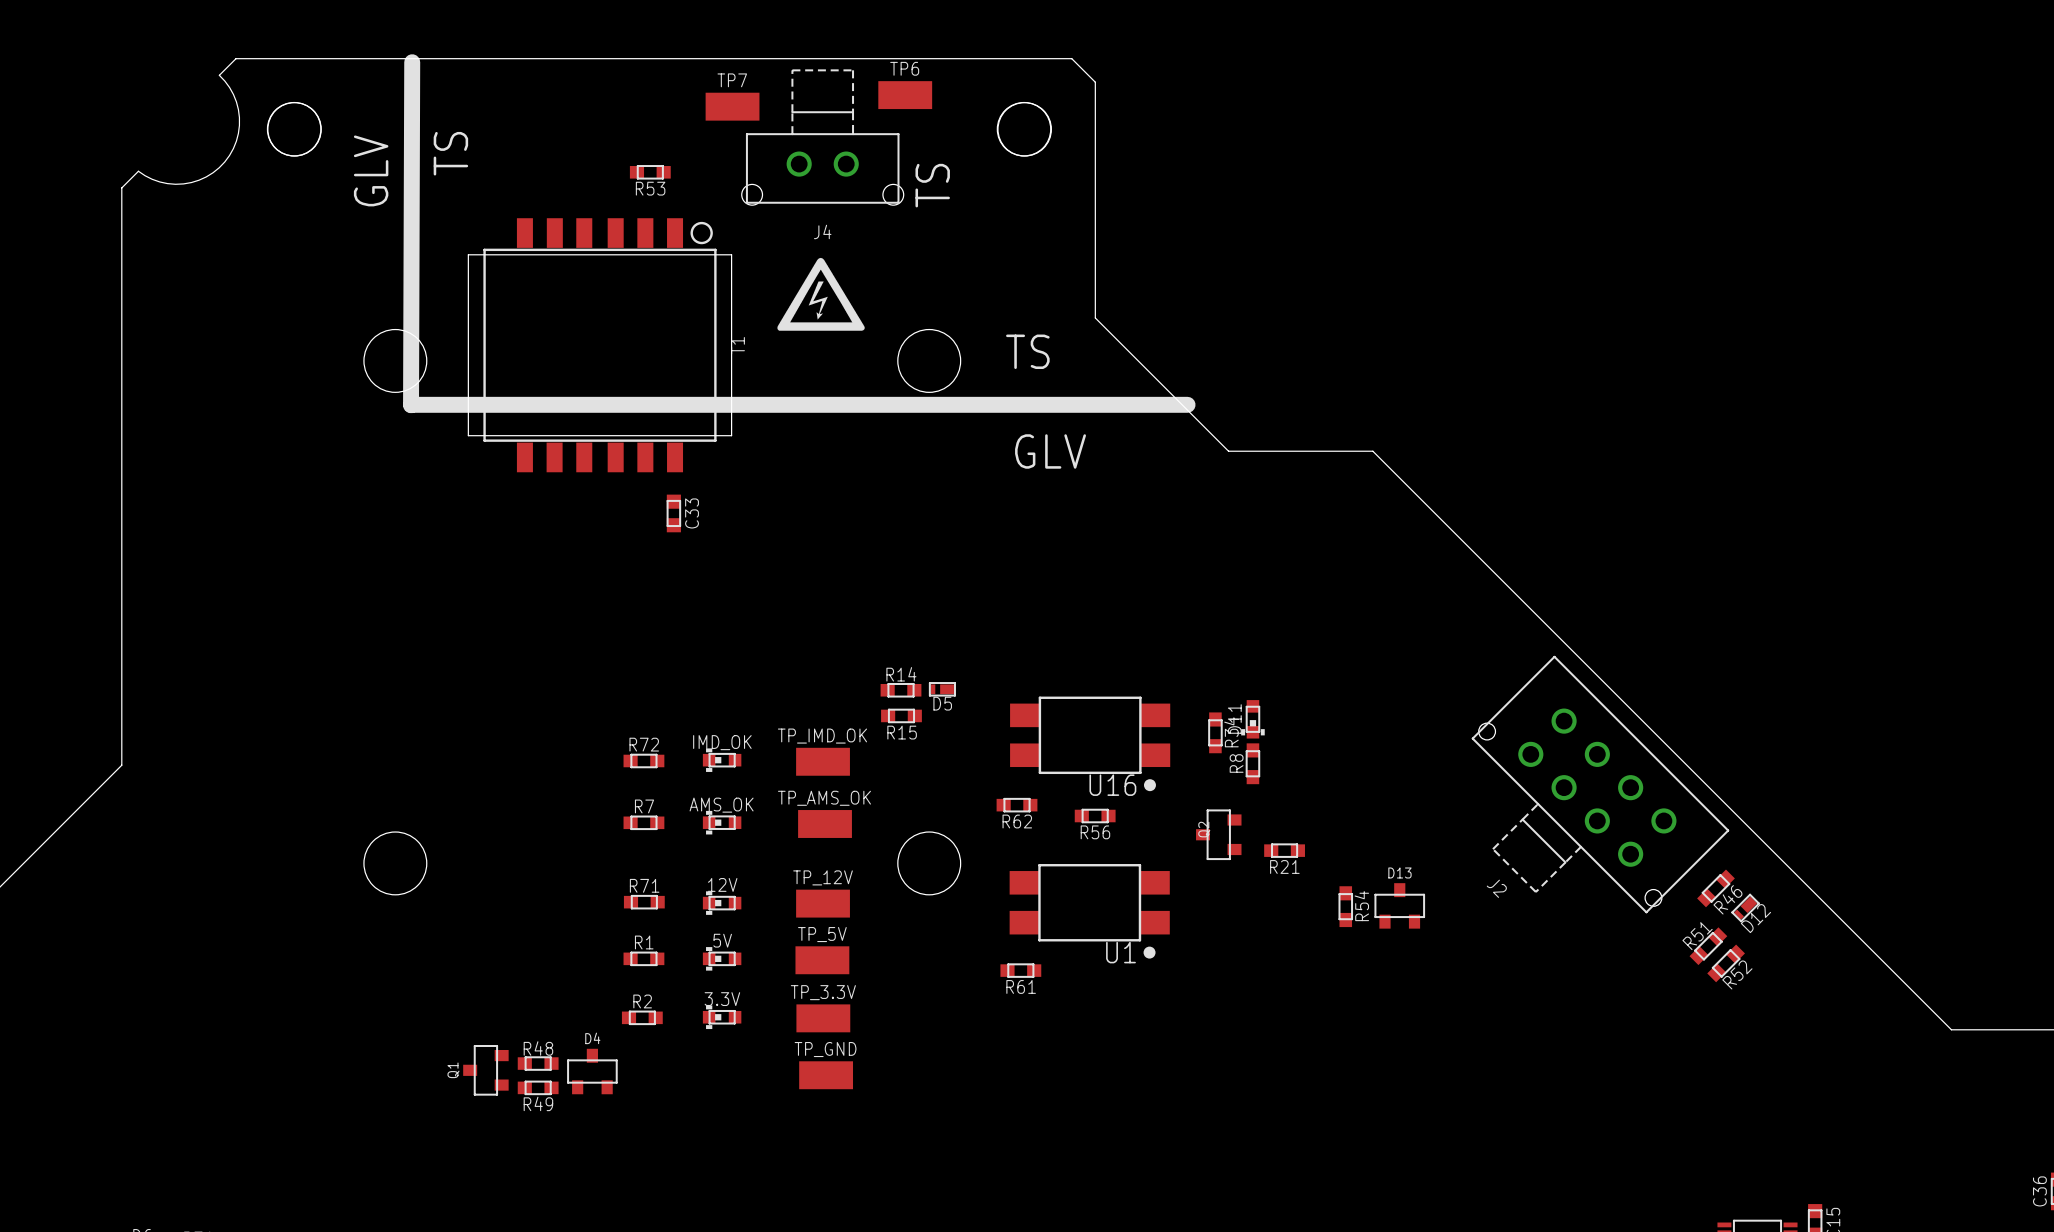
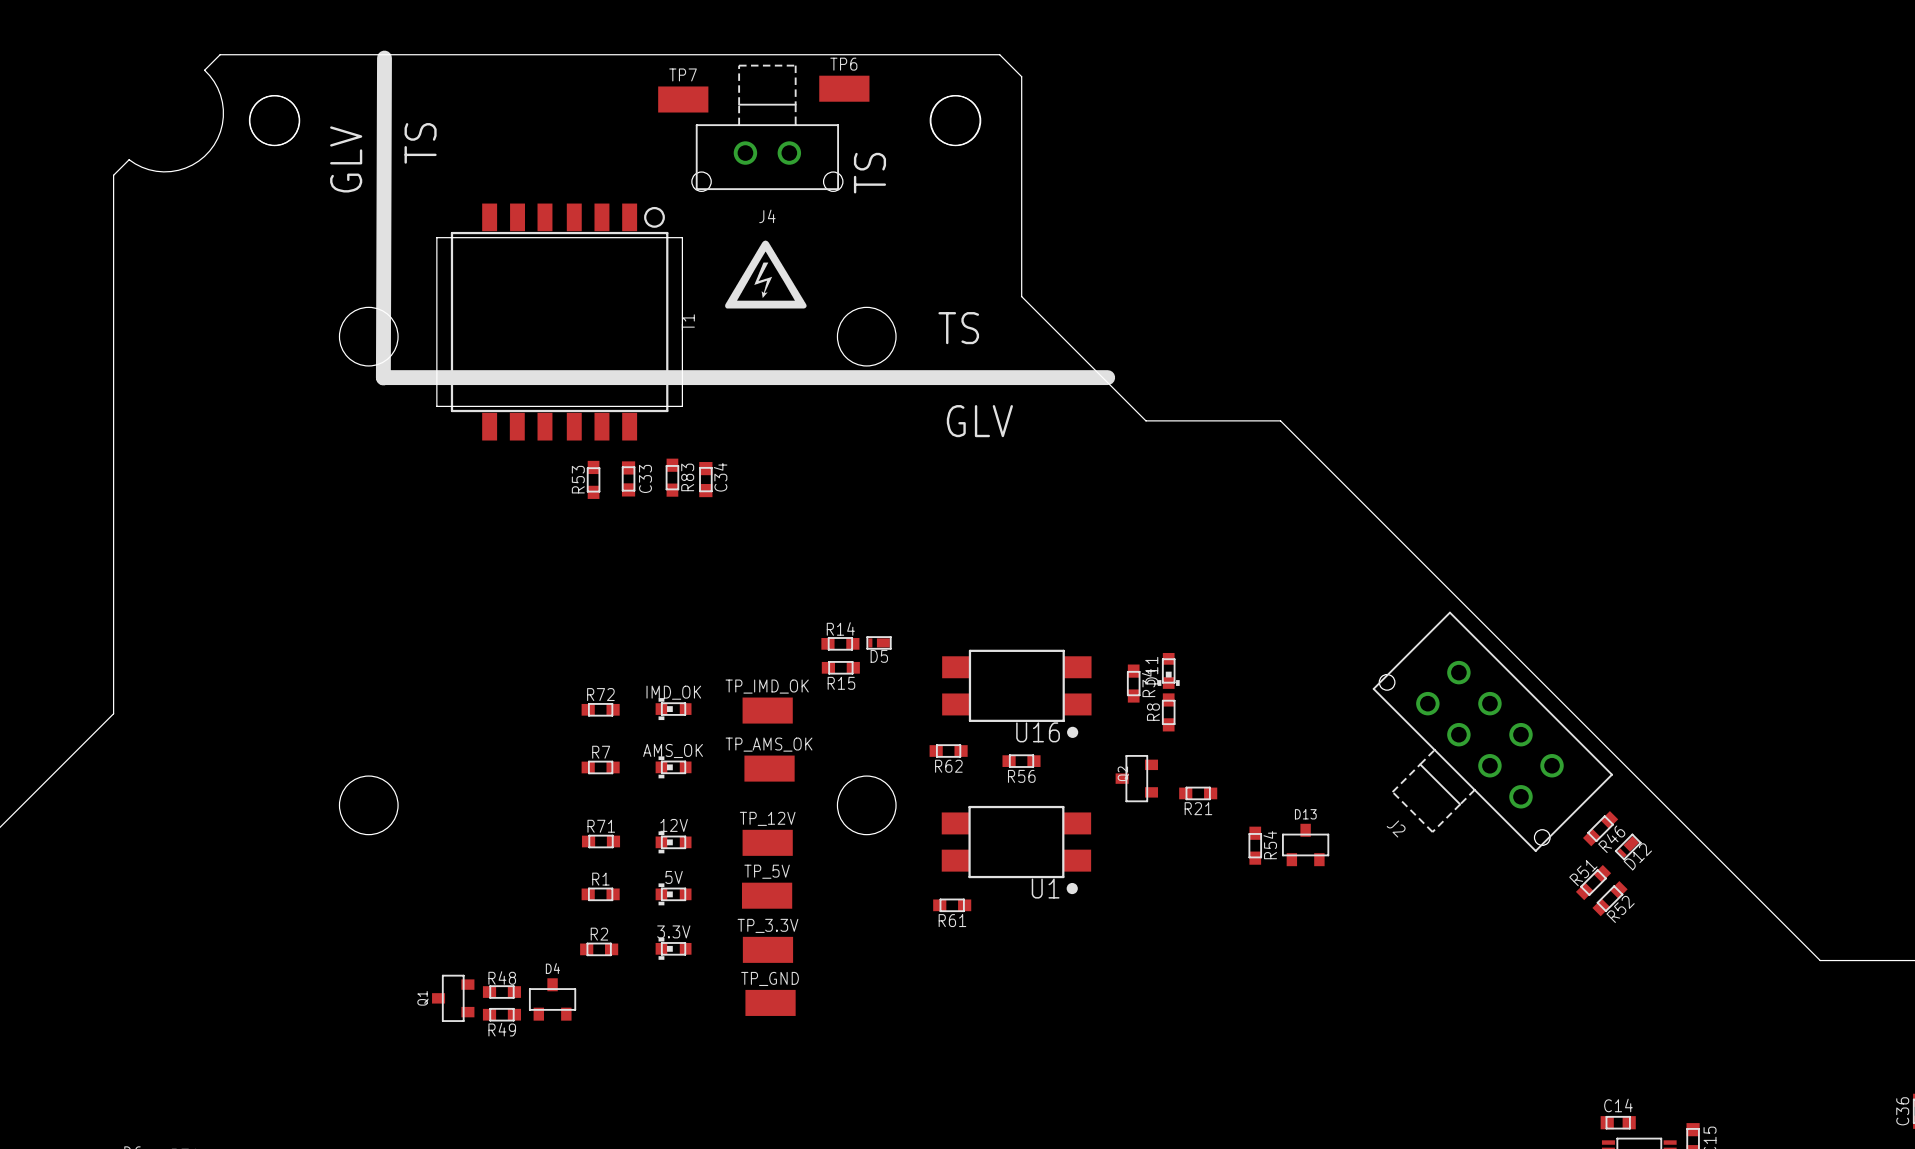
R53 rotation: 0° (650, 172) -> 90° clockwise (593, 479)
R53 position: (650, 172) -> (593, 479)
R83: none -> (672, 477)
C34: none -> (705, 479)
C14: none -> (1618, 1122)

